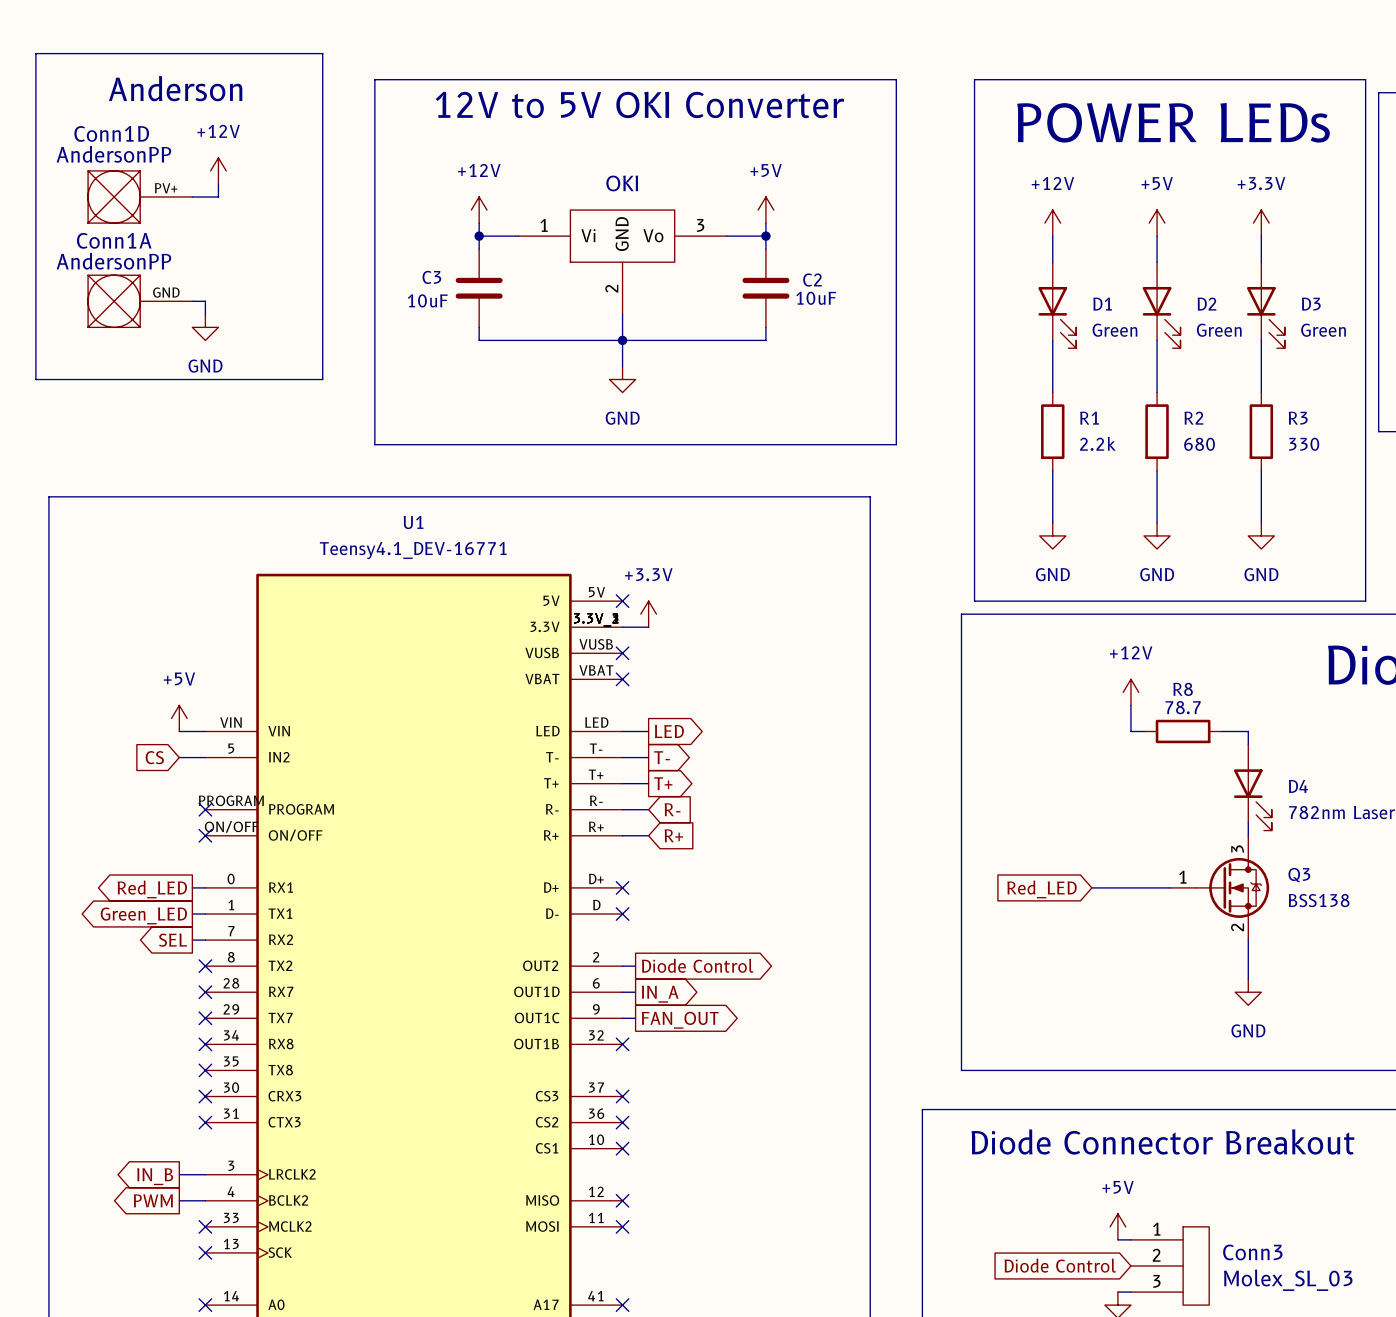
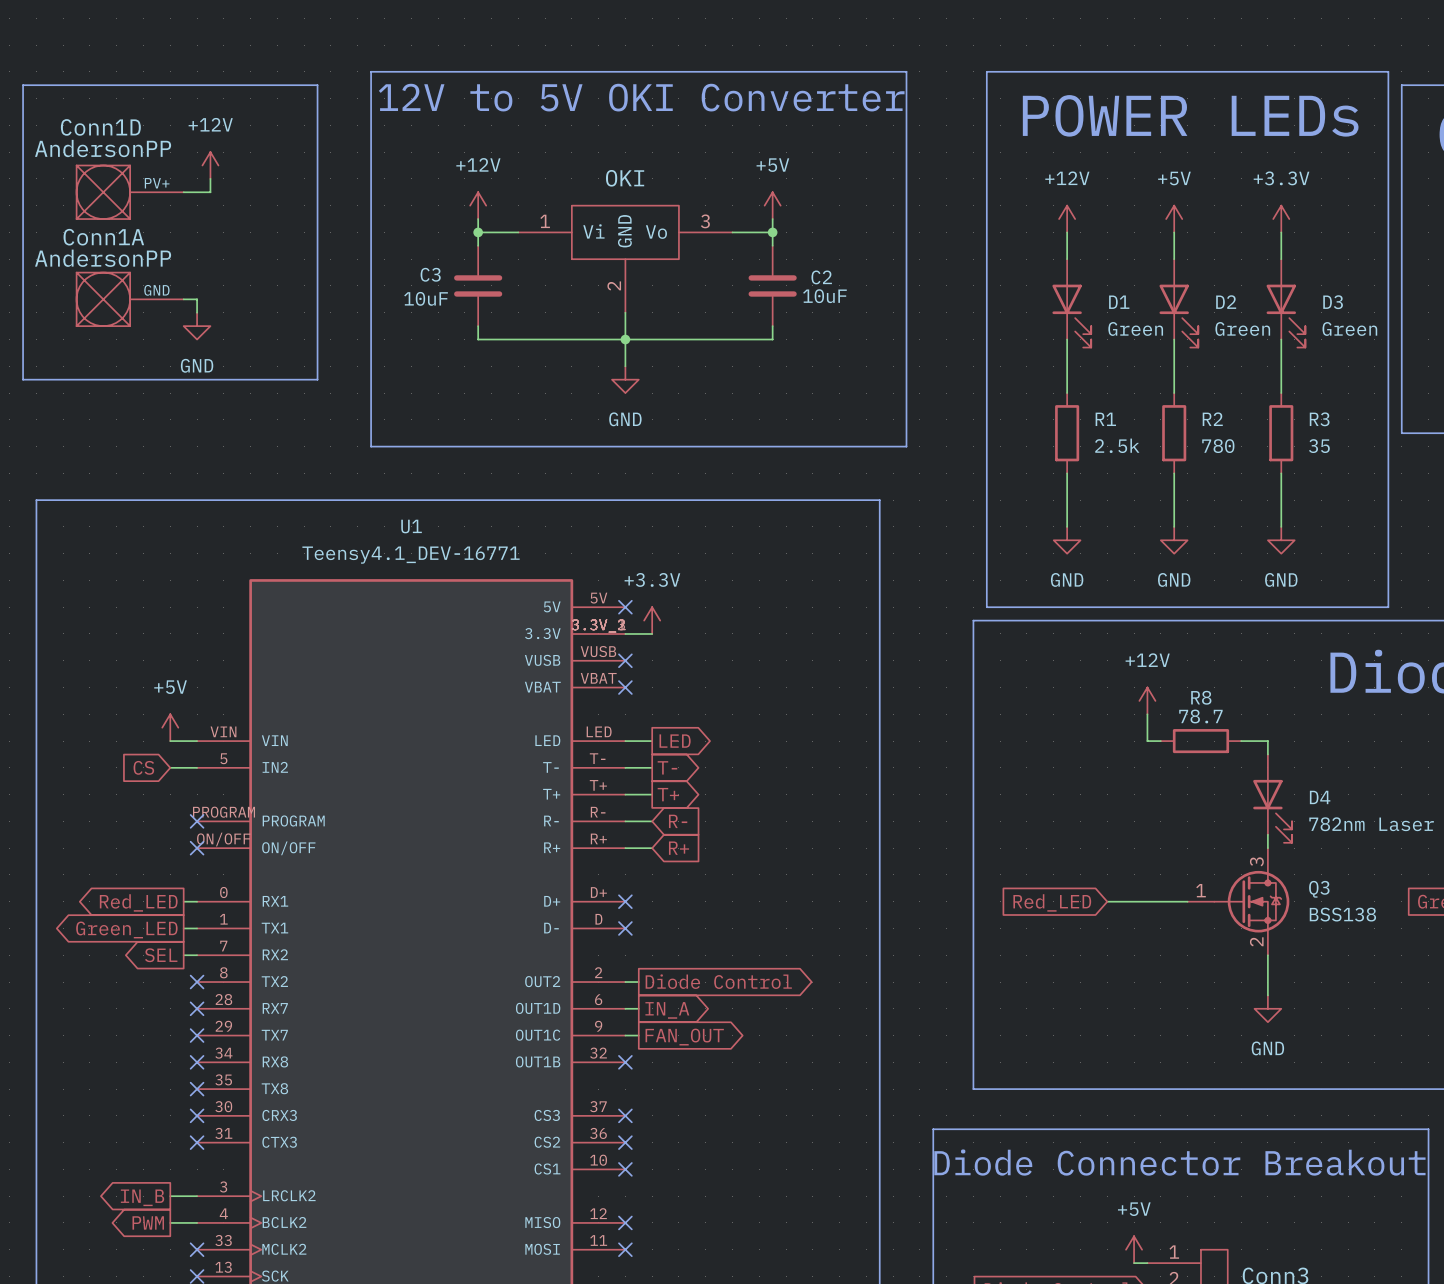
text: Anderson (175, 88) -> none
line: (35, 92) (35, 53) (322, 53) (322, 92) -> (23, 85) (317, 85)
R1 value: 2.2k (1097, 443) -> 2.5k (1117, 445)
R2 value: 680 (1199, 444) -> 780 (1218, 446)
R3 value: 330 (1304, 444) -> 35 (1319, 446)

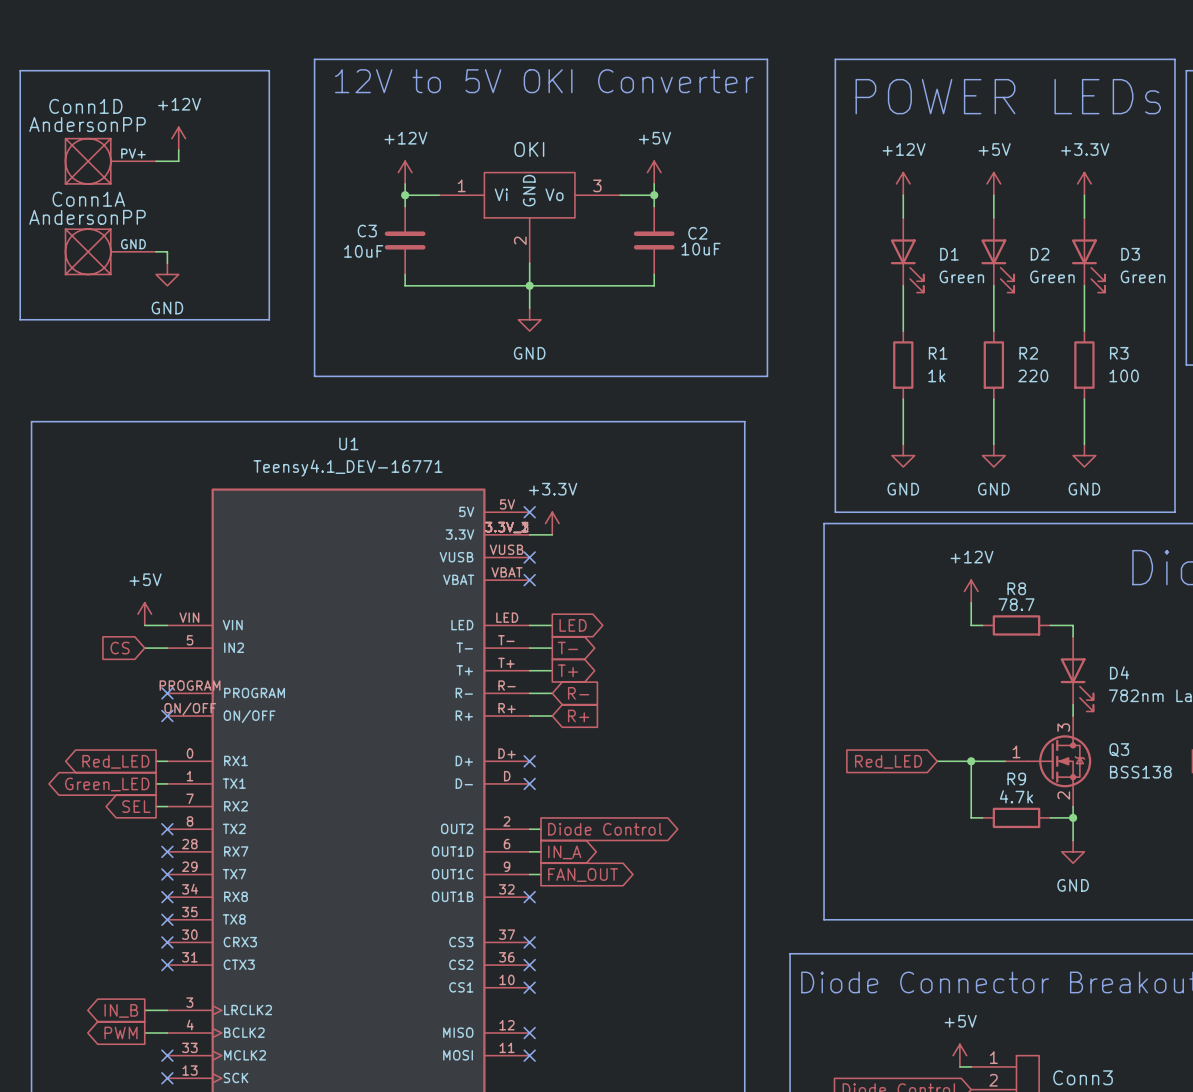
R1 value: 2.5k (1117, 445) -> 1k (936, 375)
R2 value: 780 (1218, 446) -> 220 (1033, 375)
R3 value: 35 (1319, 446) -> 100 (1124, 375)
wire: none -> (971, 761) (971, 817) (982, 817)
junction: none -> (971, 761)
R9: none -> 4.7k (1016, 817)
wire: none -> (1050, 817) (1073, 817)
junction: none -> (1073, 817)

